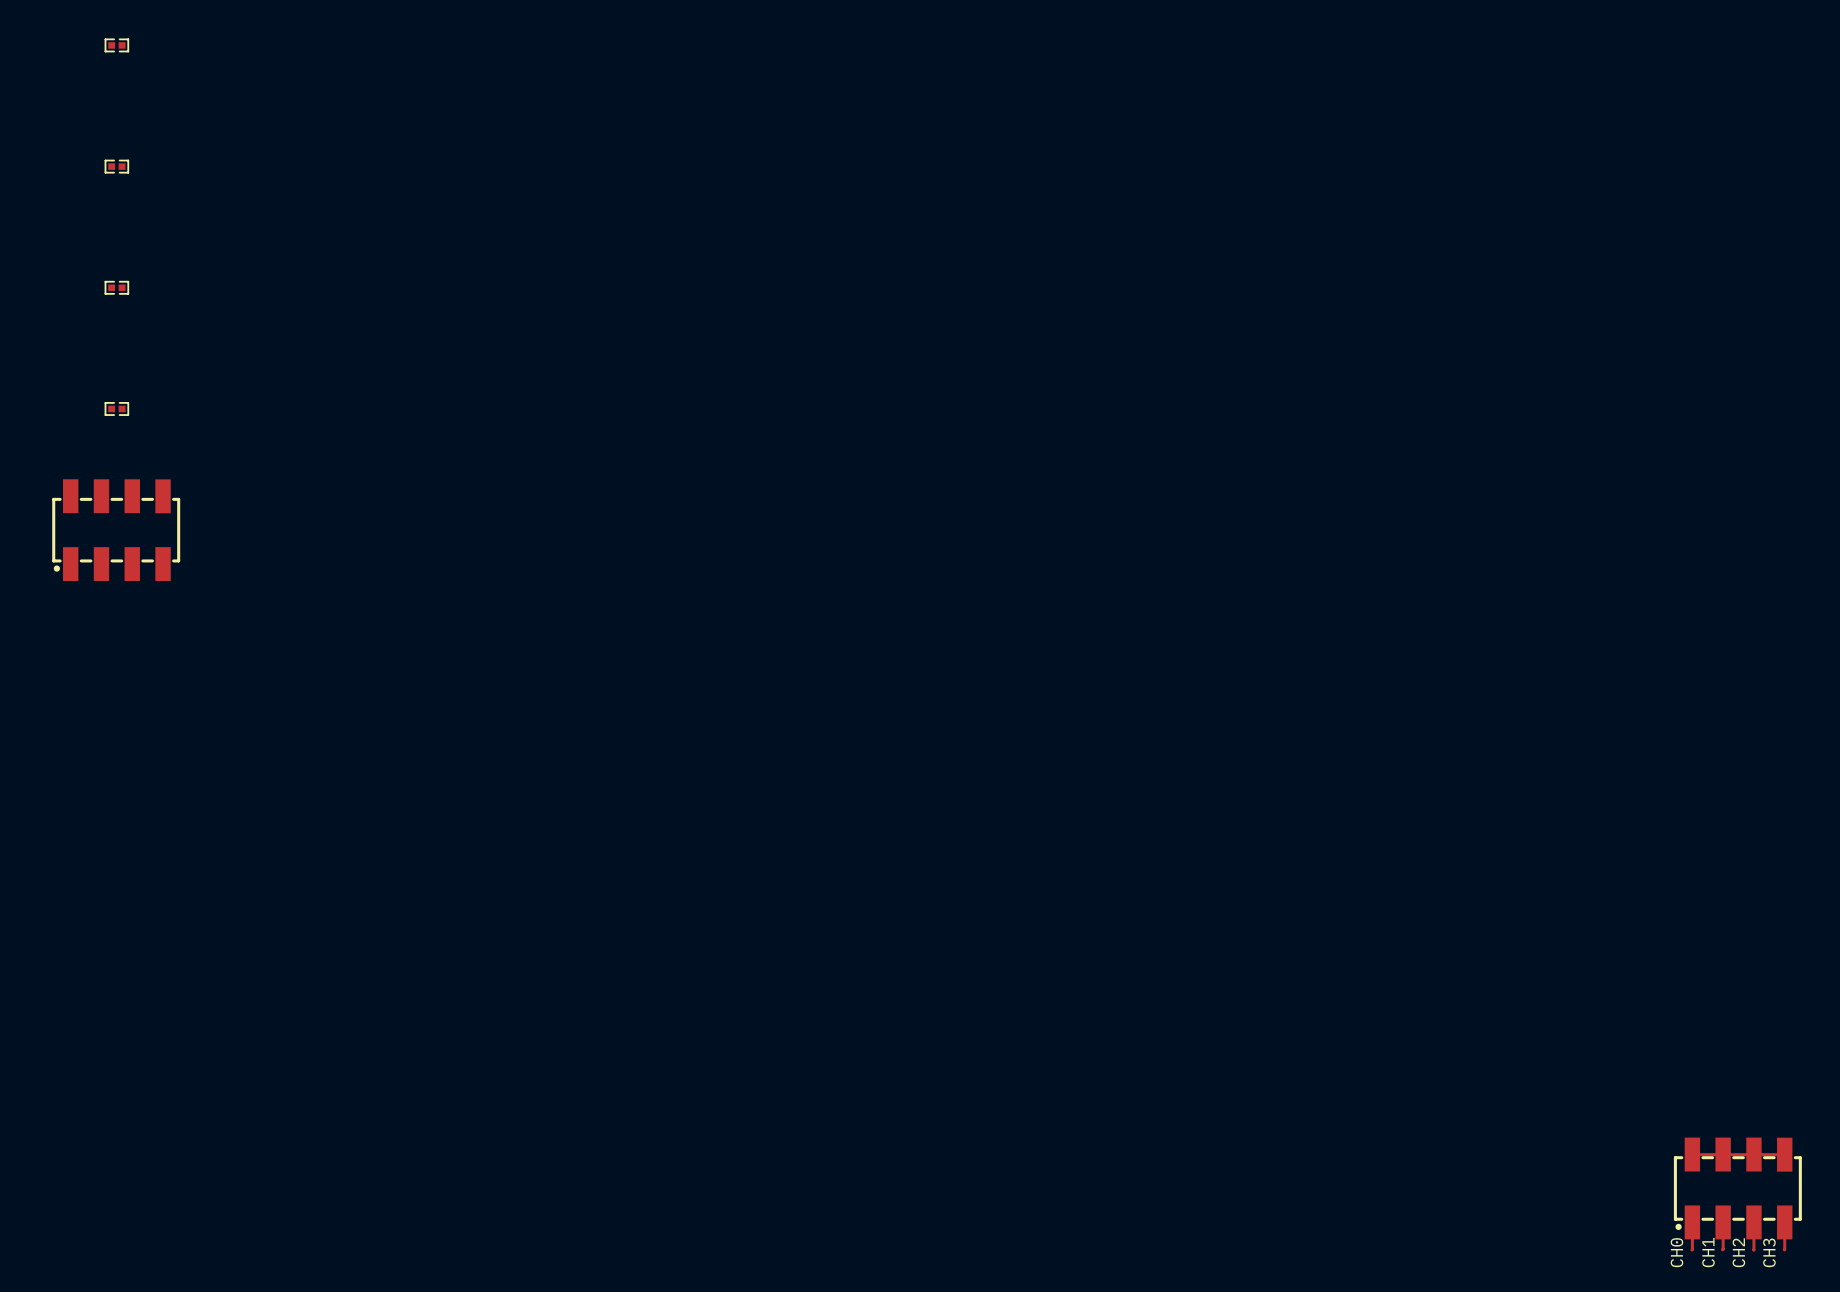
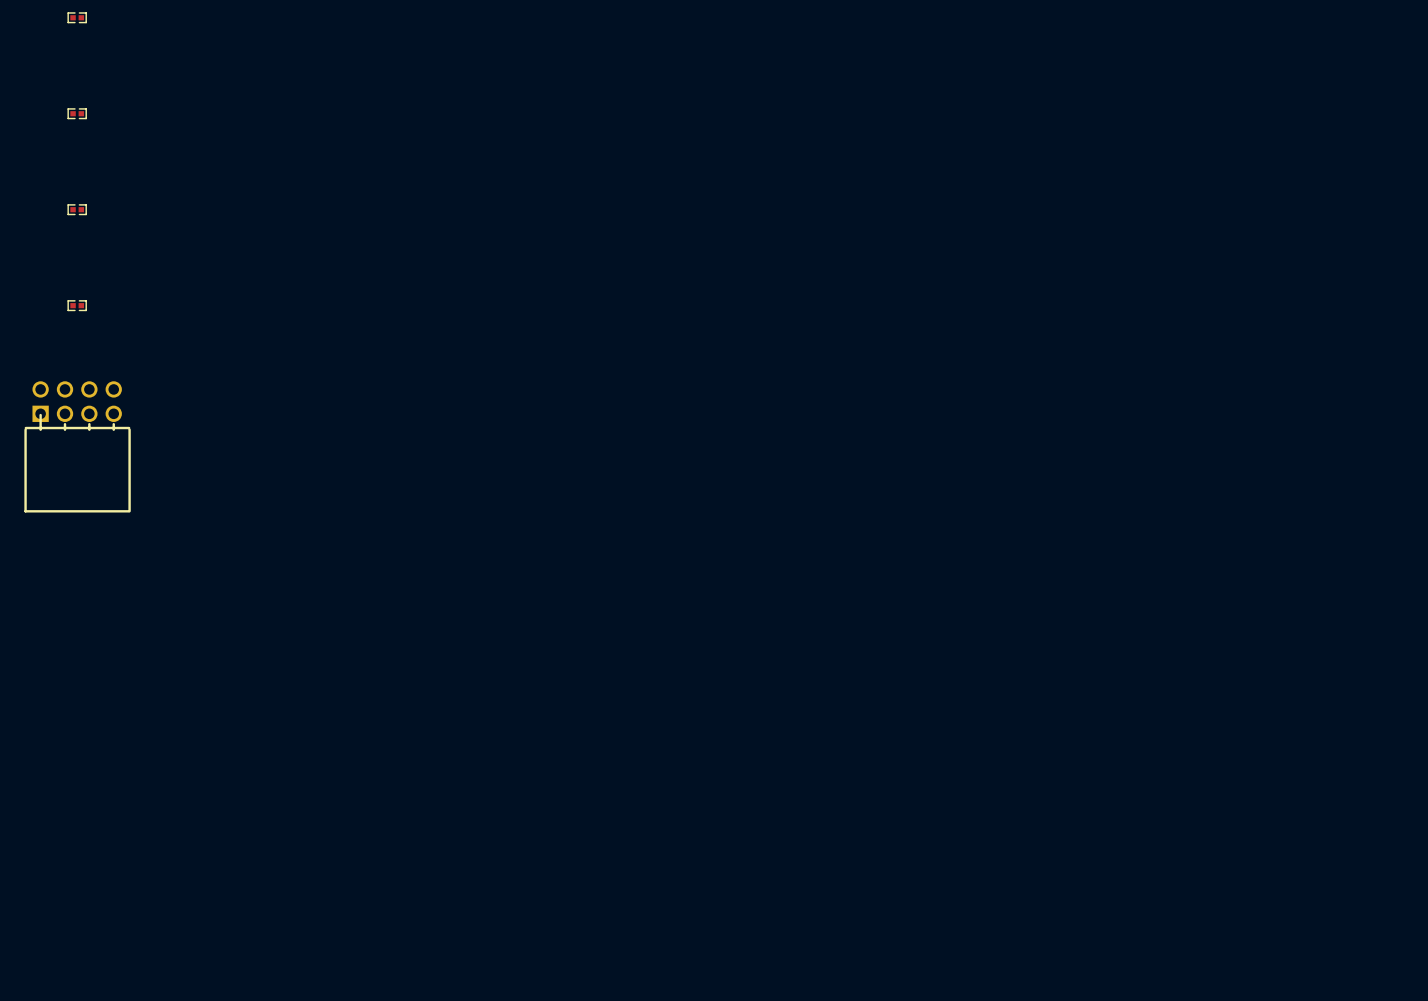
part: (116, 530) -> none
part: none -> (77, 446)
track: (1692, 1154) (1784, 1154) -> none
part: (1737, 1188) -> none
track: (1692, 1222) (1691, 1250) -> none
track: (1723, 1222) (1722, 1249) -> none
track: (1753, 1222) (1753, 1250) -> none
track: (1784, 1222) (1784, 1249) -> none
text: CH0 (1676, 1252) -> none
text: CH1 (1708, 1252) -> none
text: CH2 (1738, 1252) -> none
text: CH3 (1769, 1252) -> none

